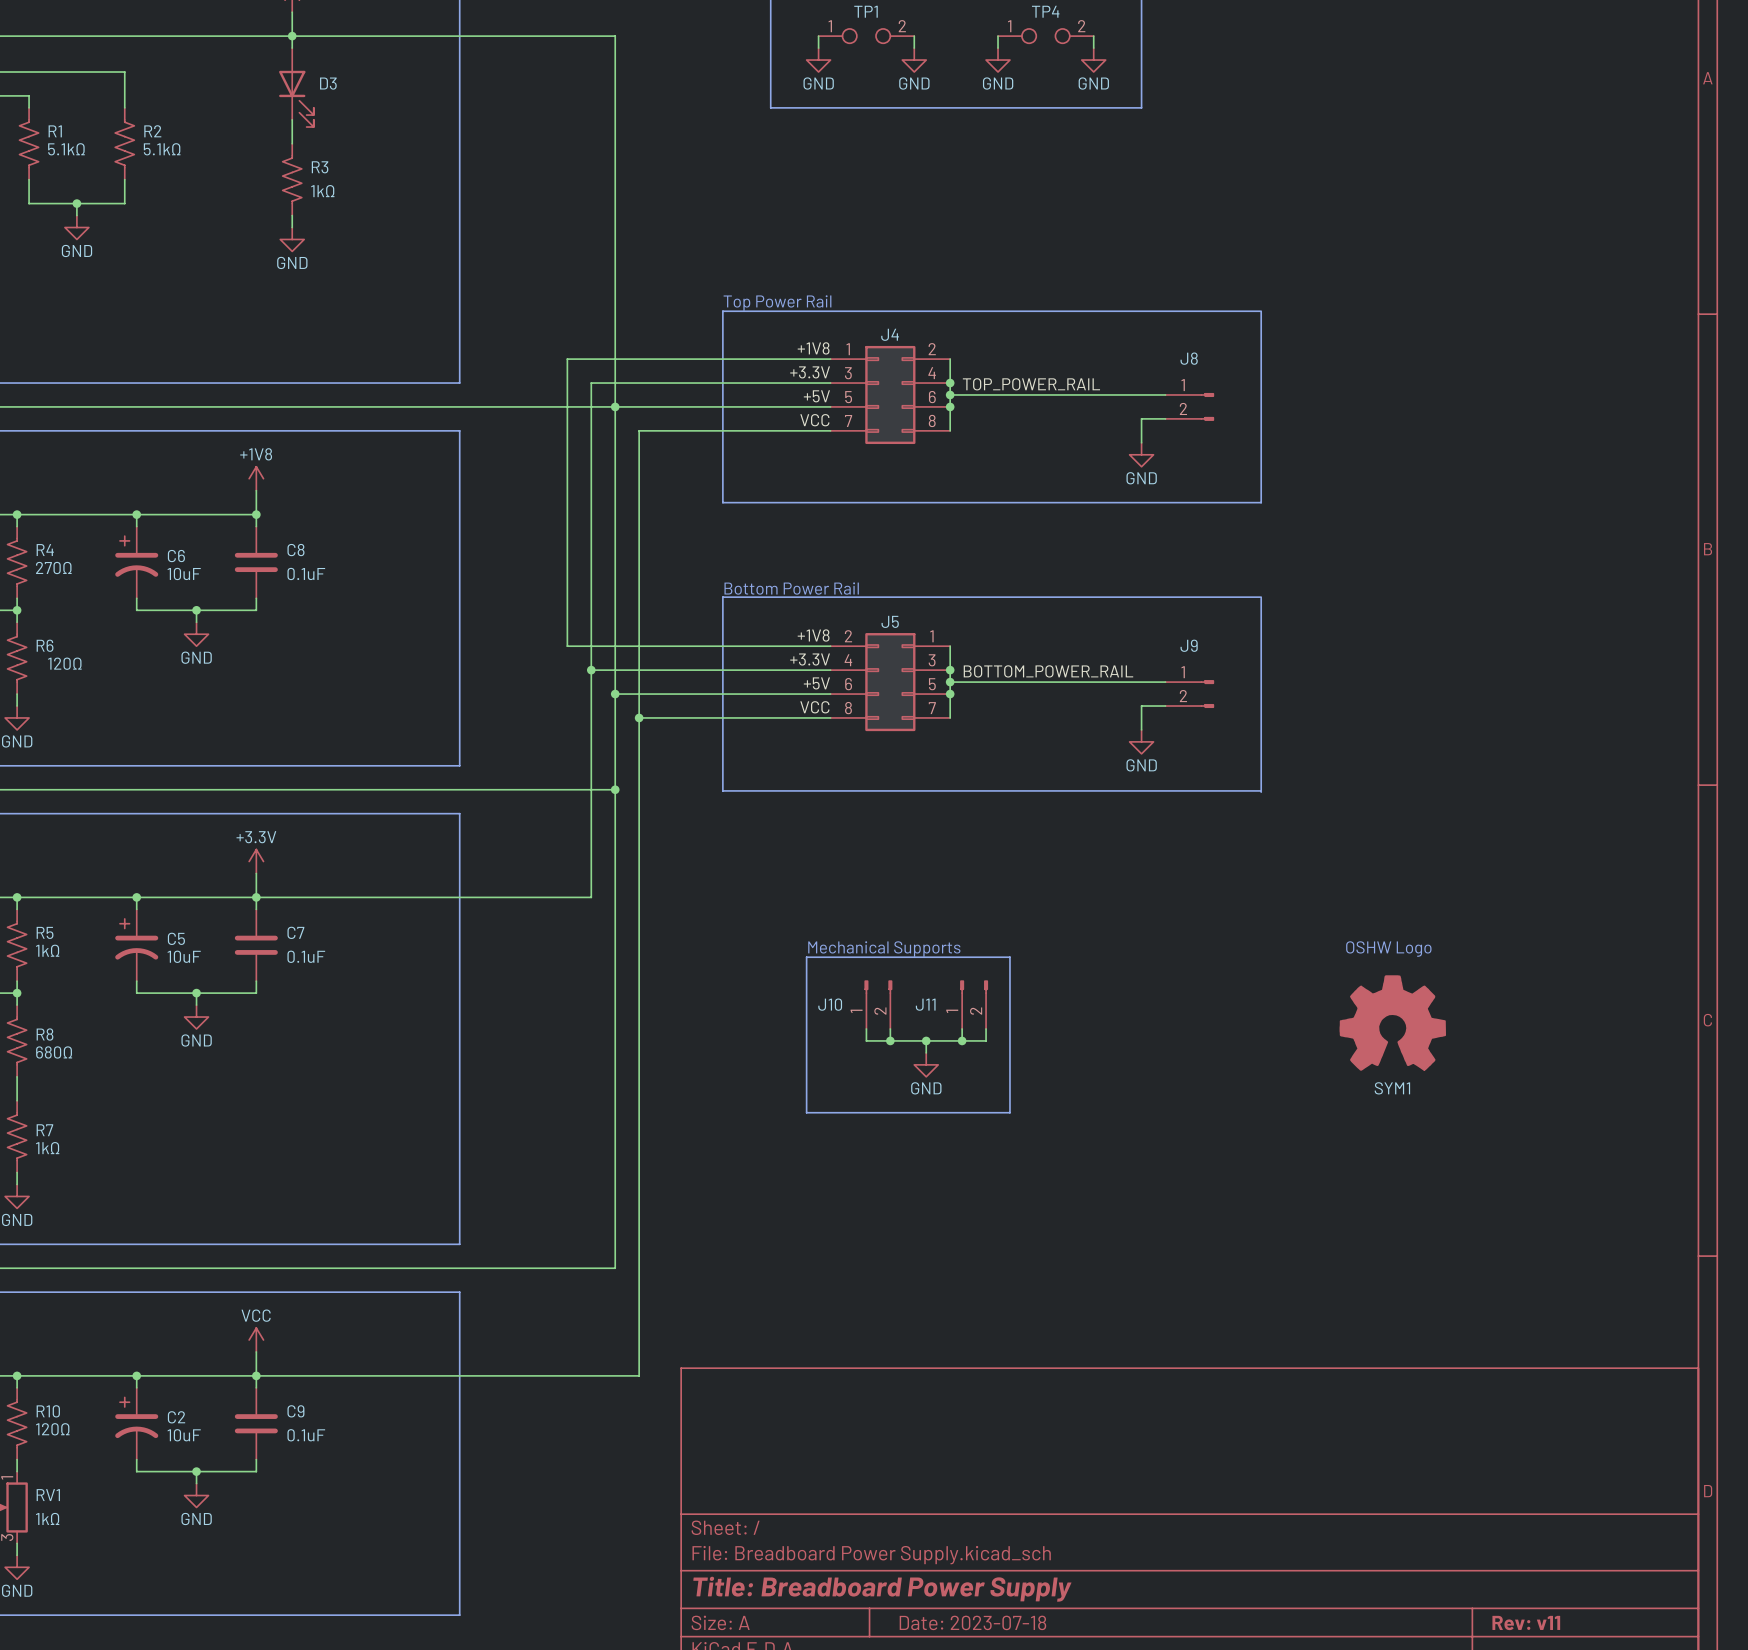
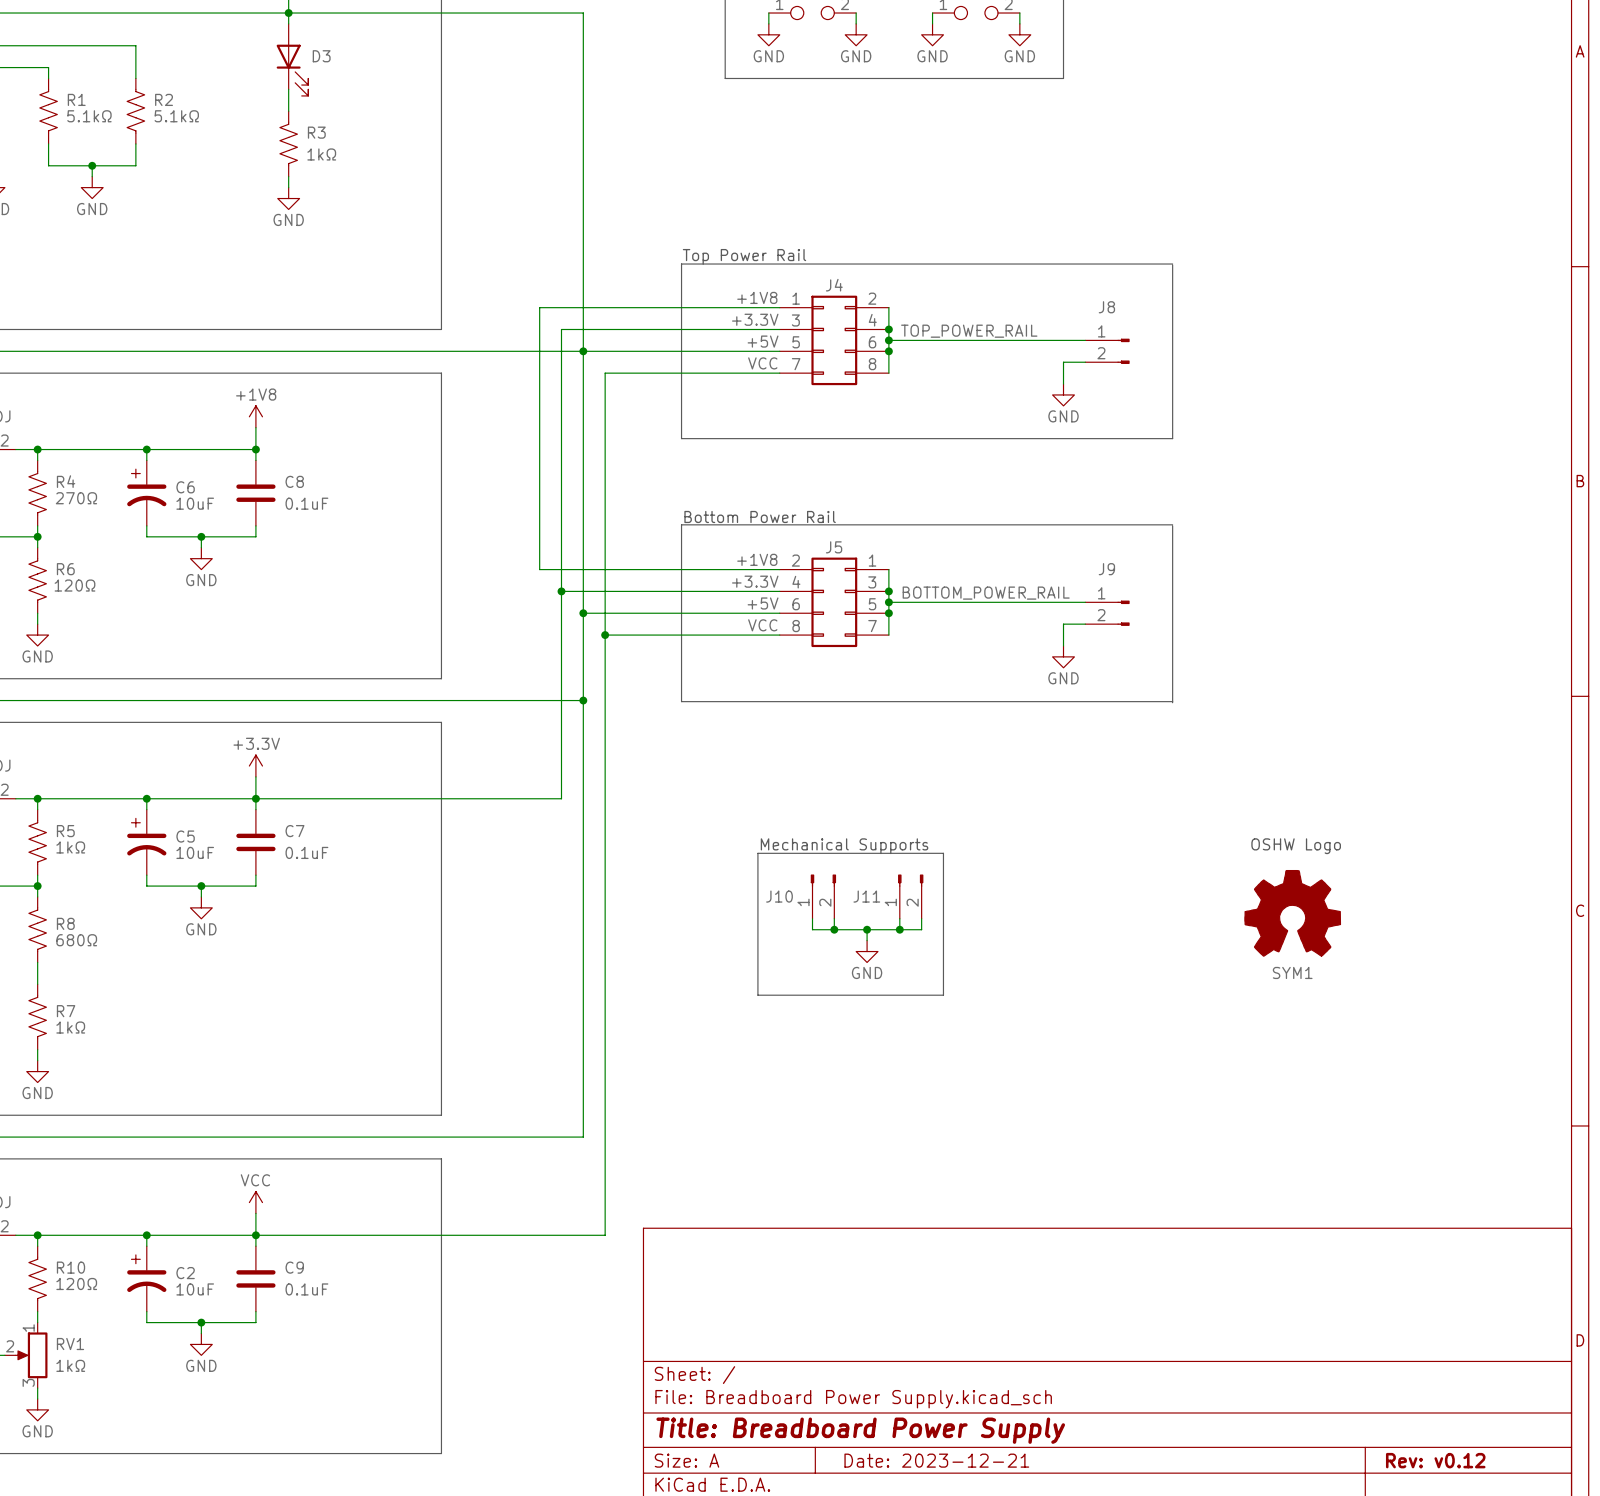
title block: Date: 2023-07-18 (972, 1622) -> Date: 2023-12-21 (936, 1460)
title block: Rev: v11 (1526, 1622) -> Rev: v0.12 (1435, 1460)

